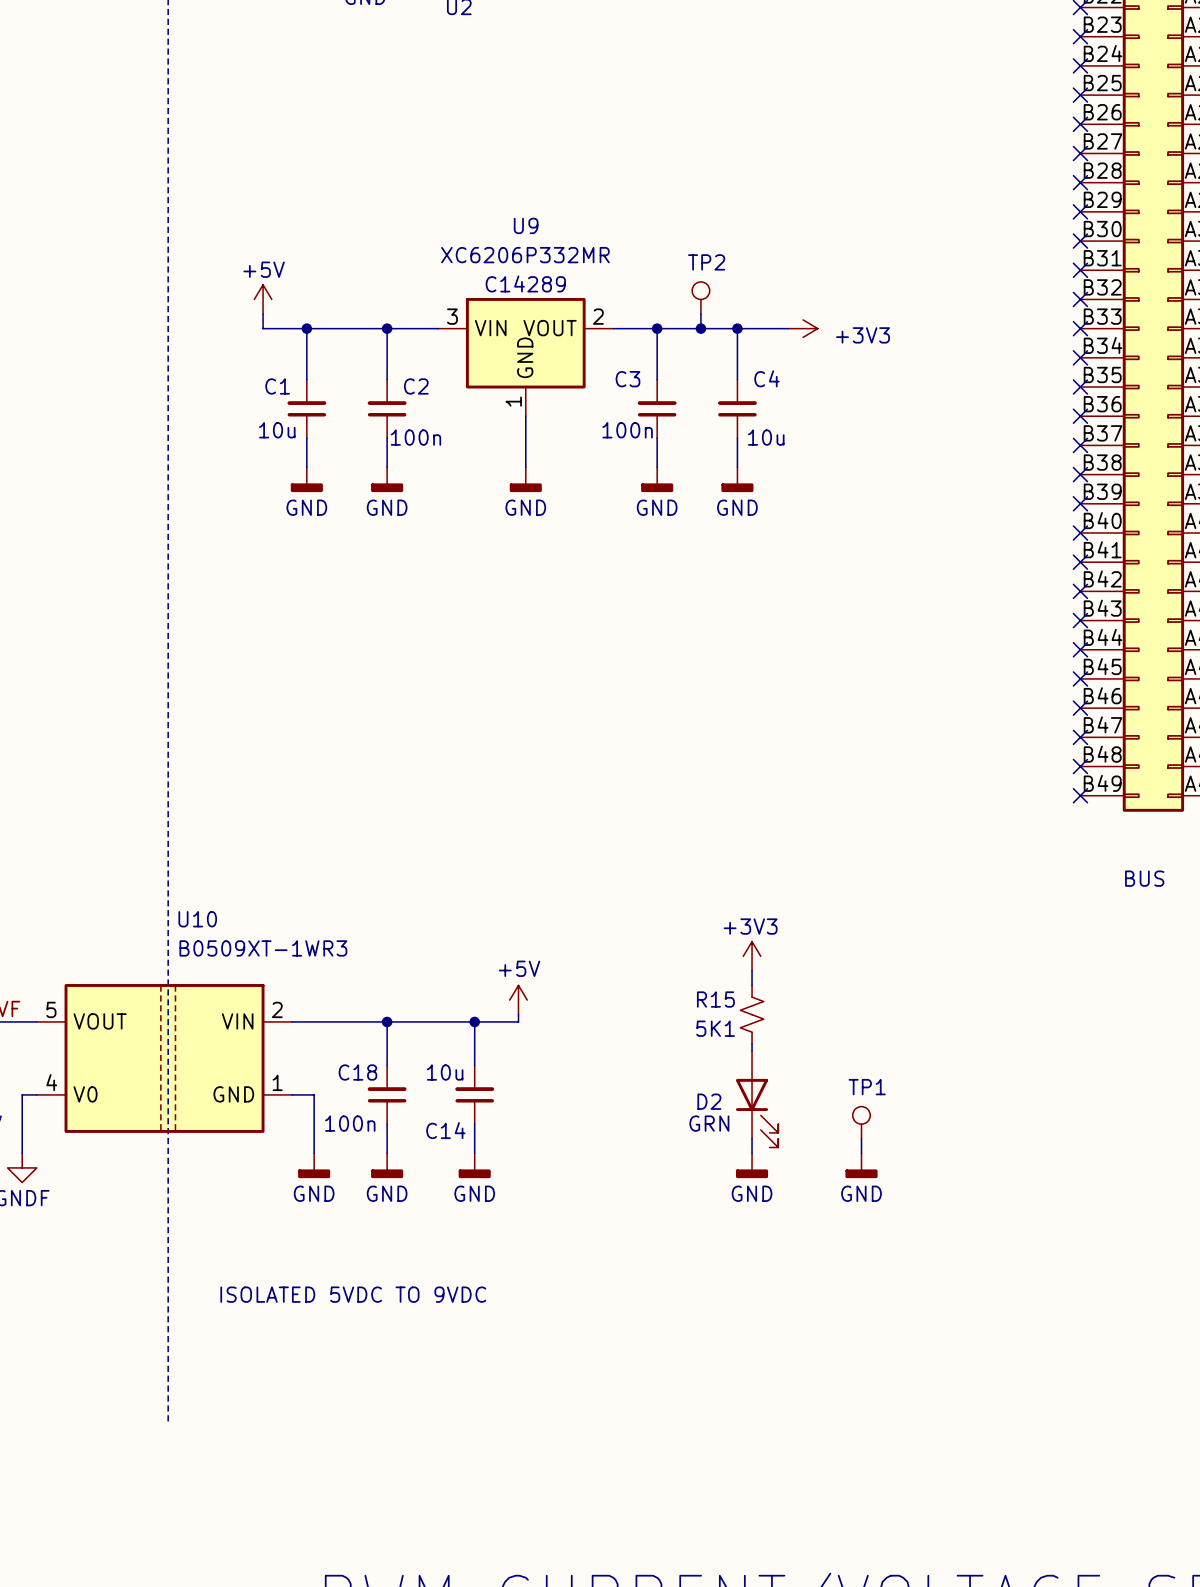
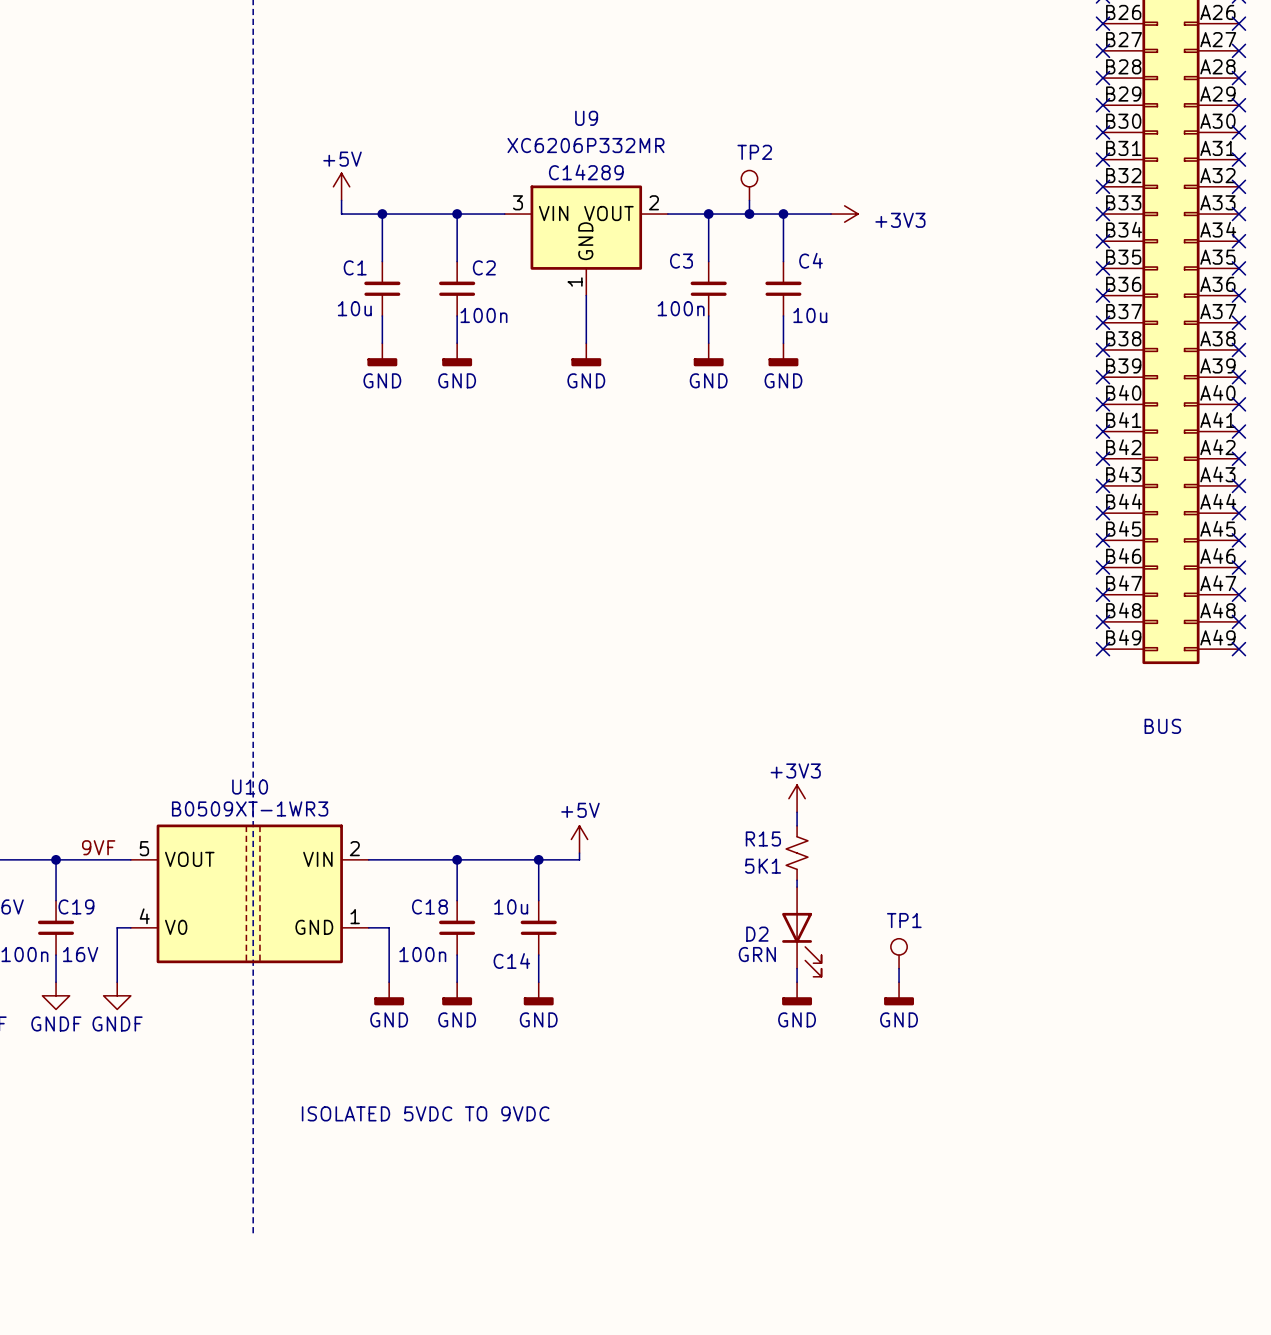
U10 name position: U10 (197, 919) -> U10 (250, 787)
U10 value position: B0509XT-1WR3 (263, 948) -> B0509XT-1WR3 (250, 808)

